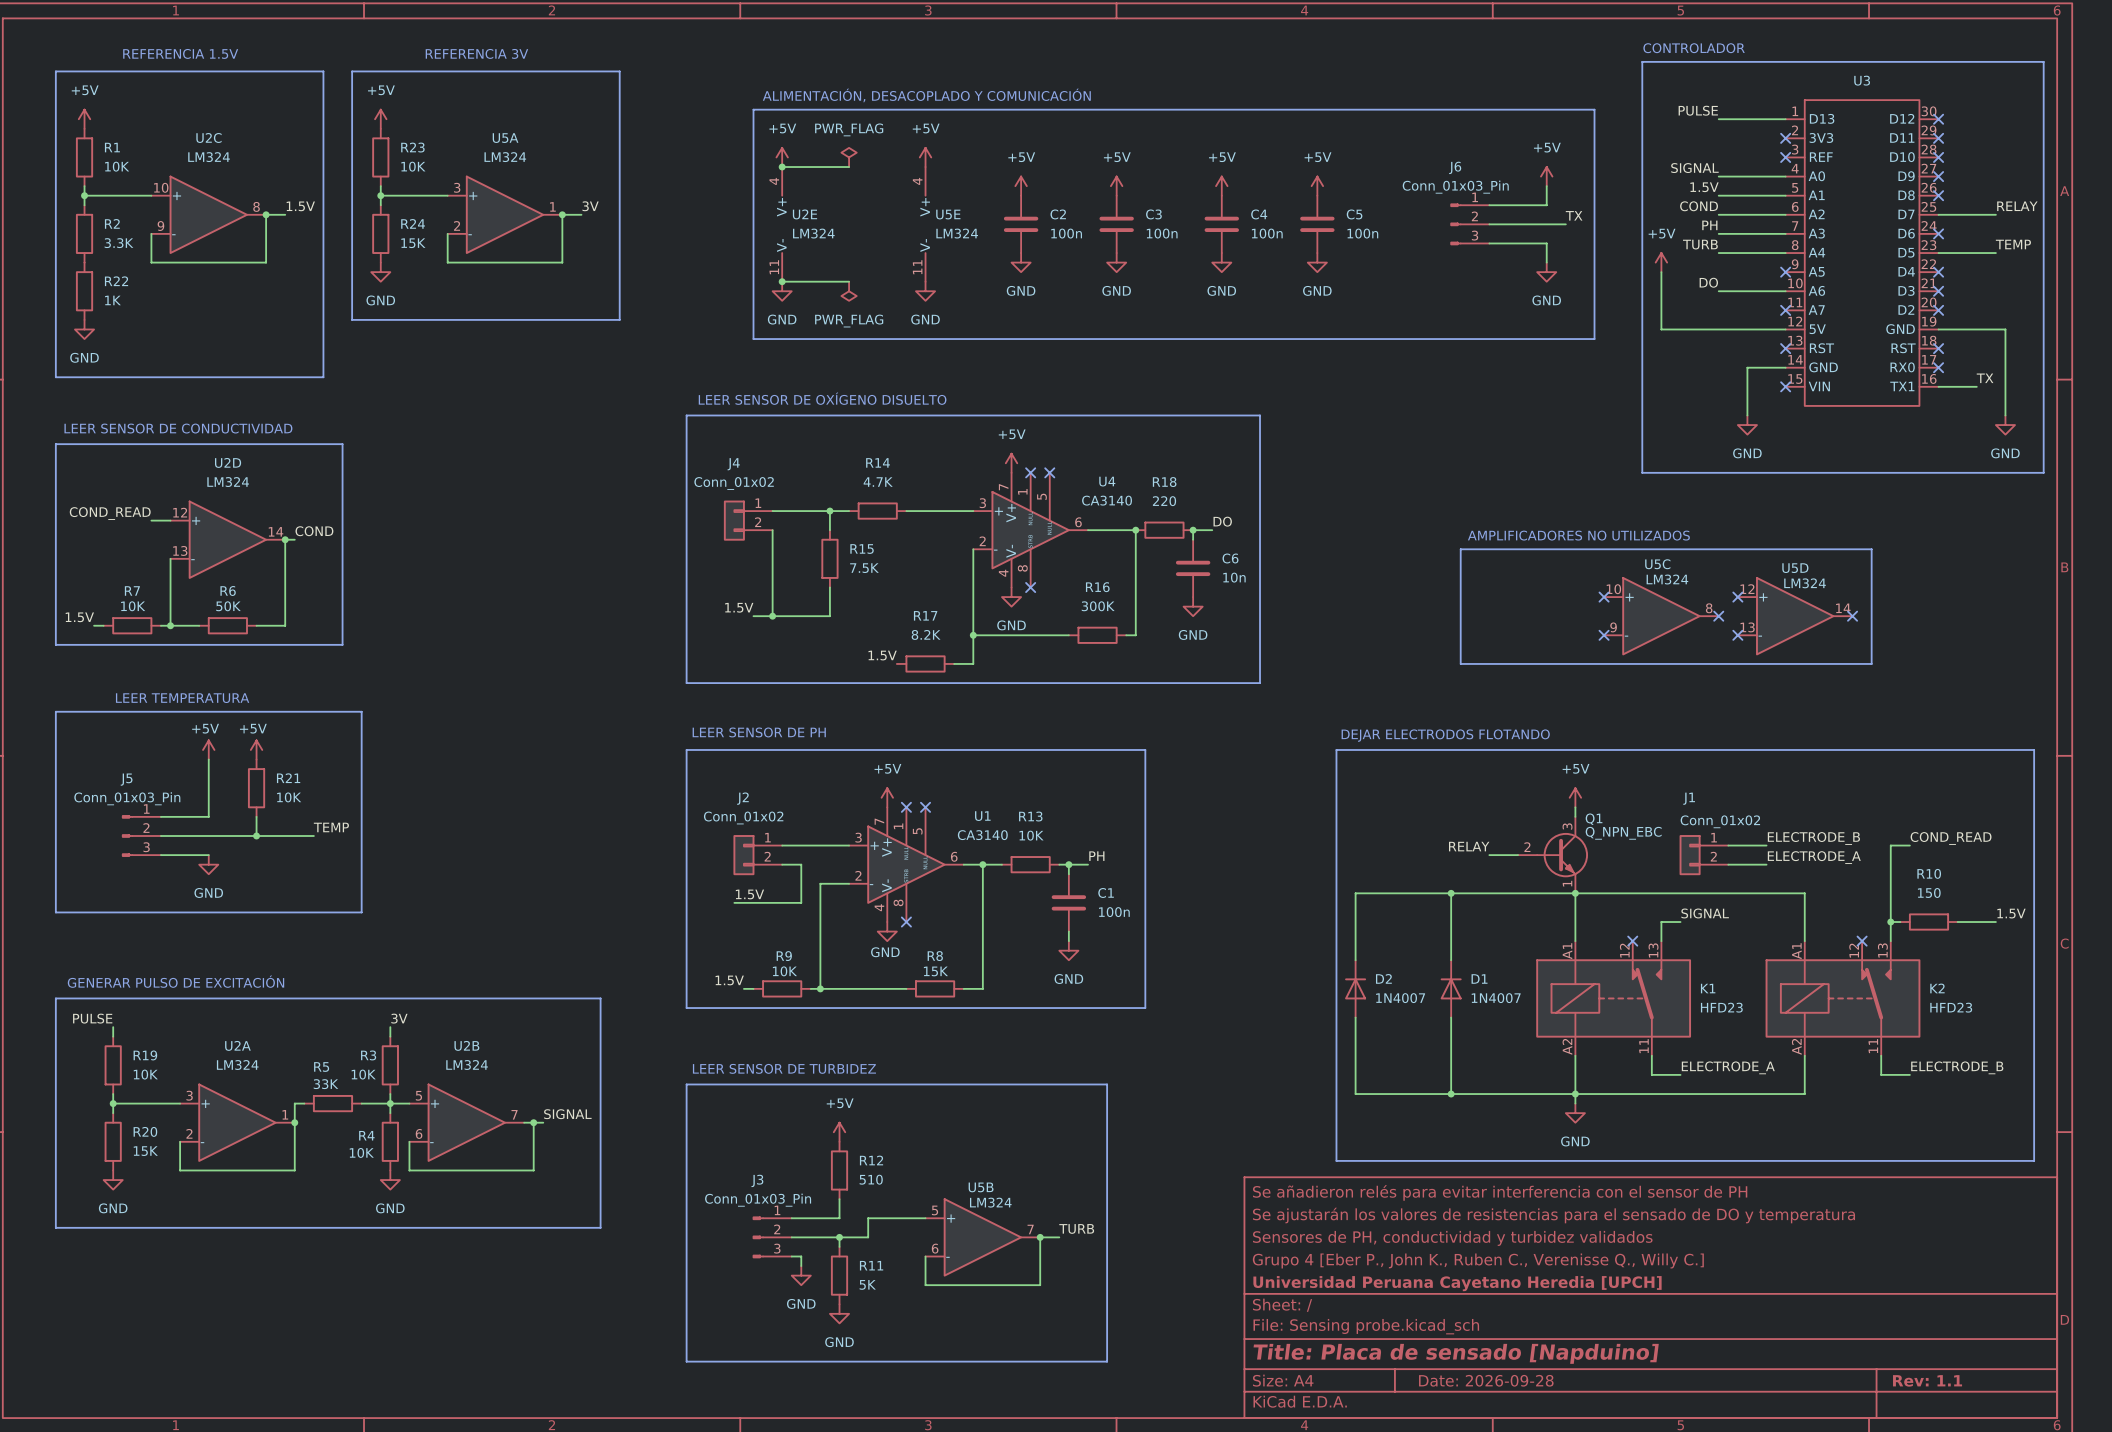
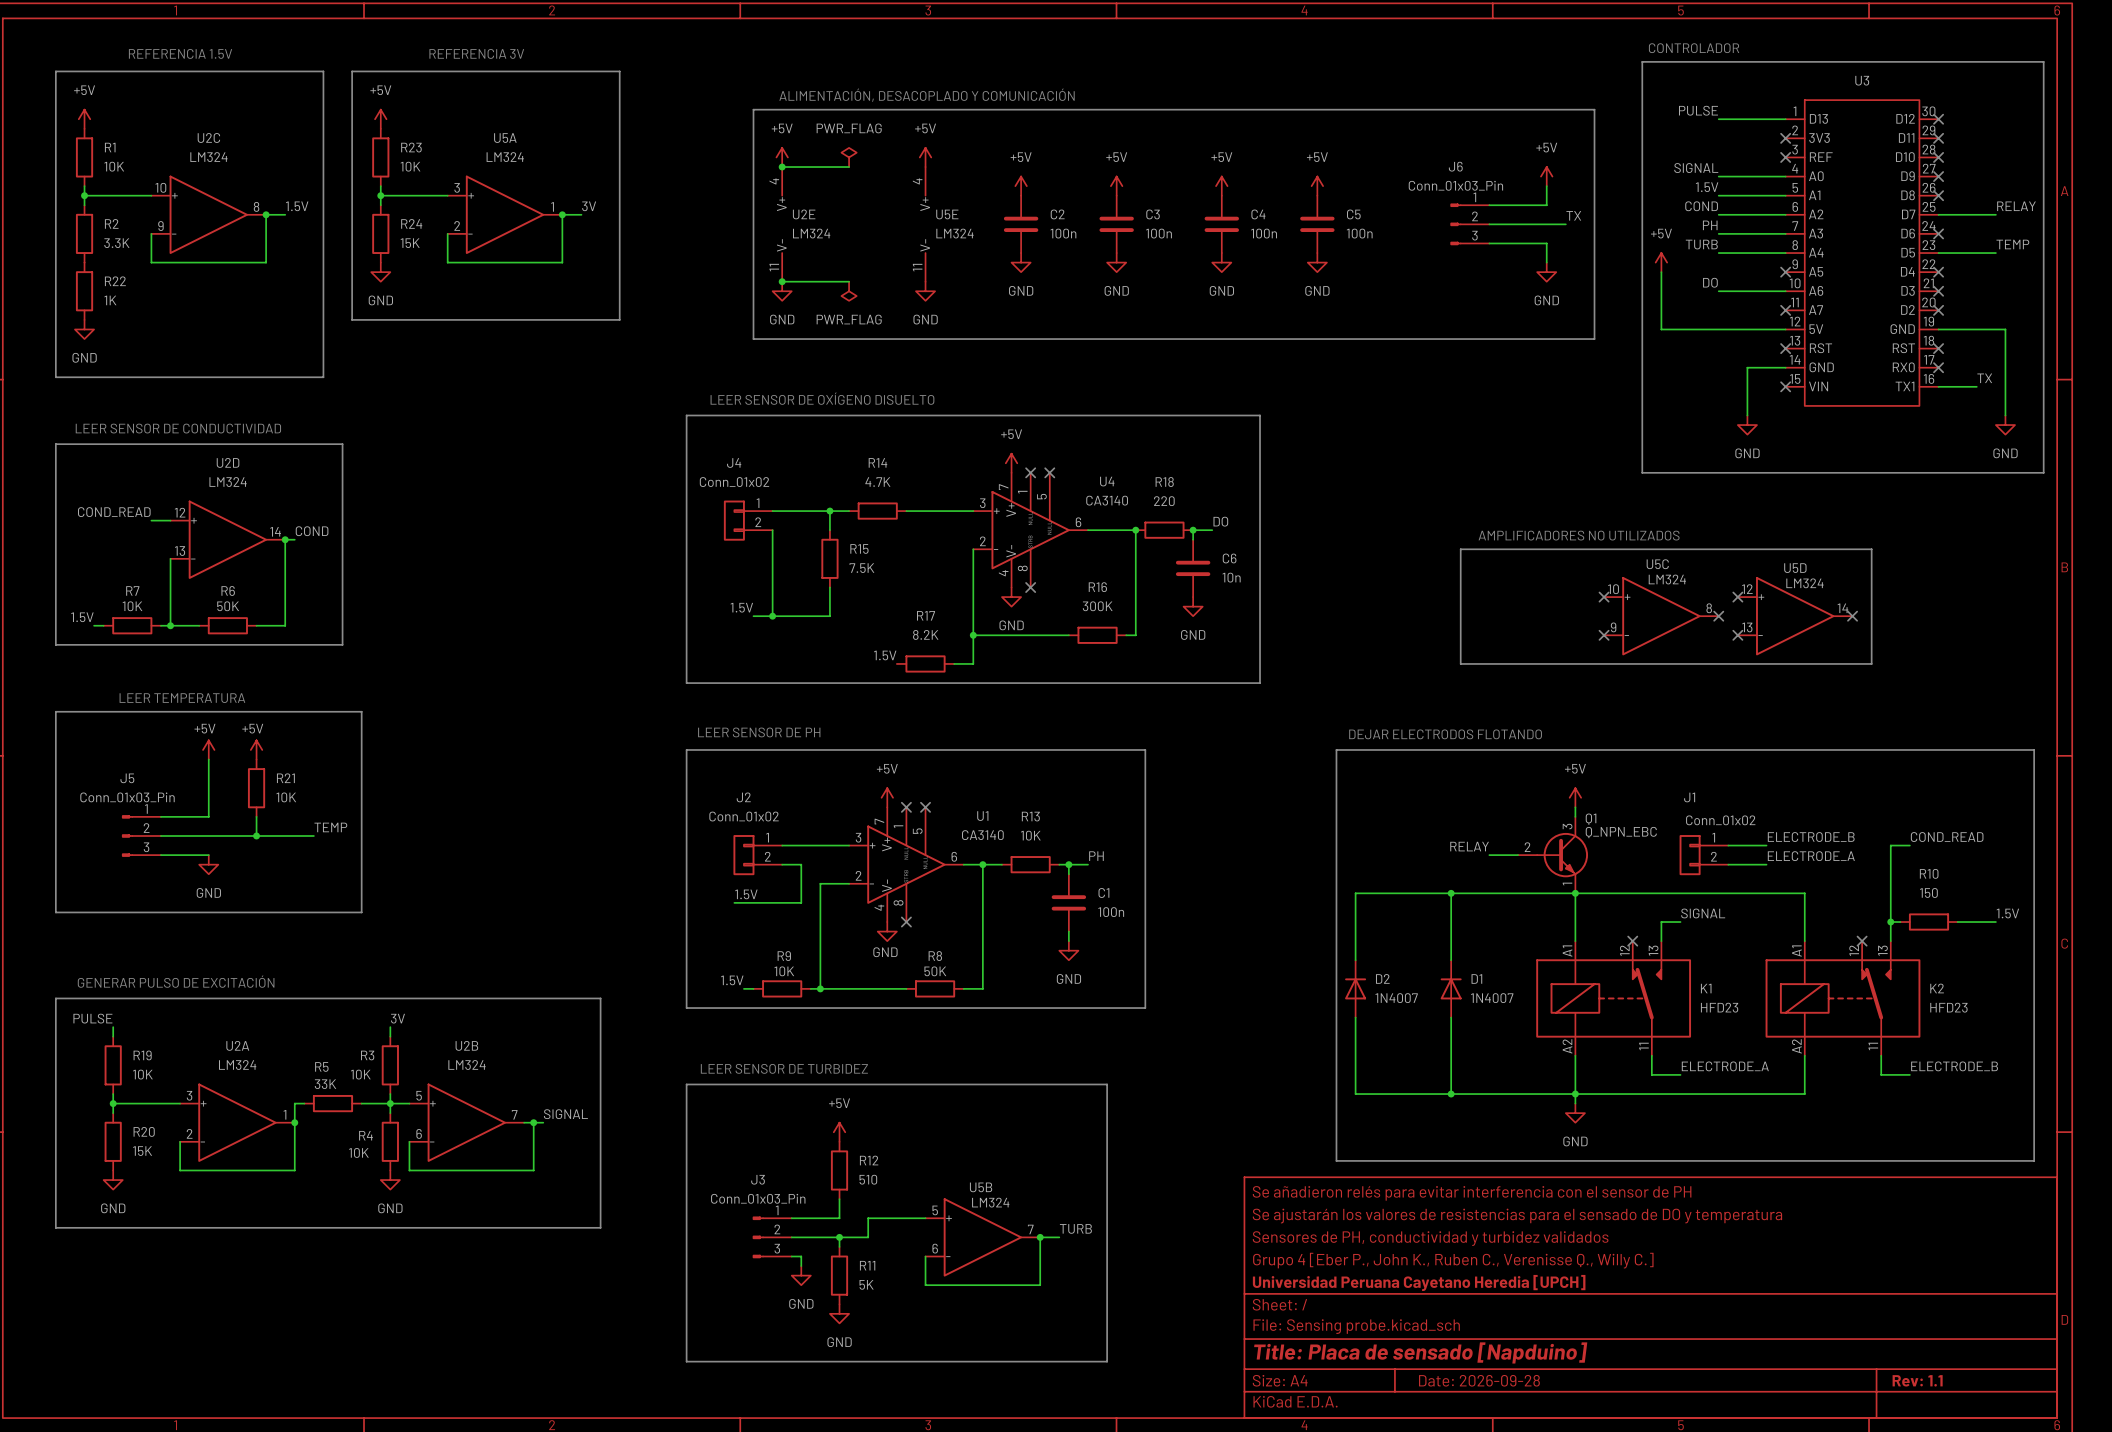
R8 value: 15K (935, 971) -> 50K (935, 971)

